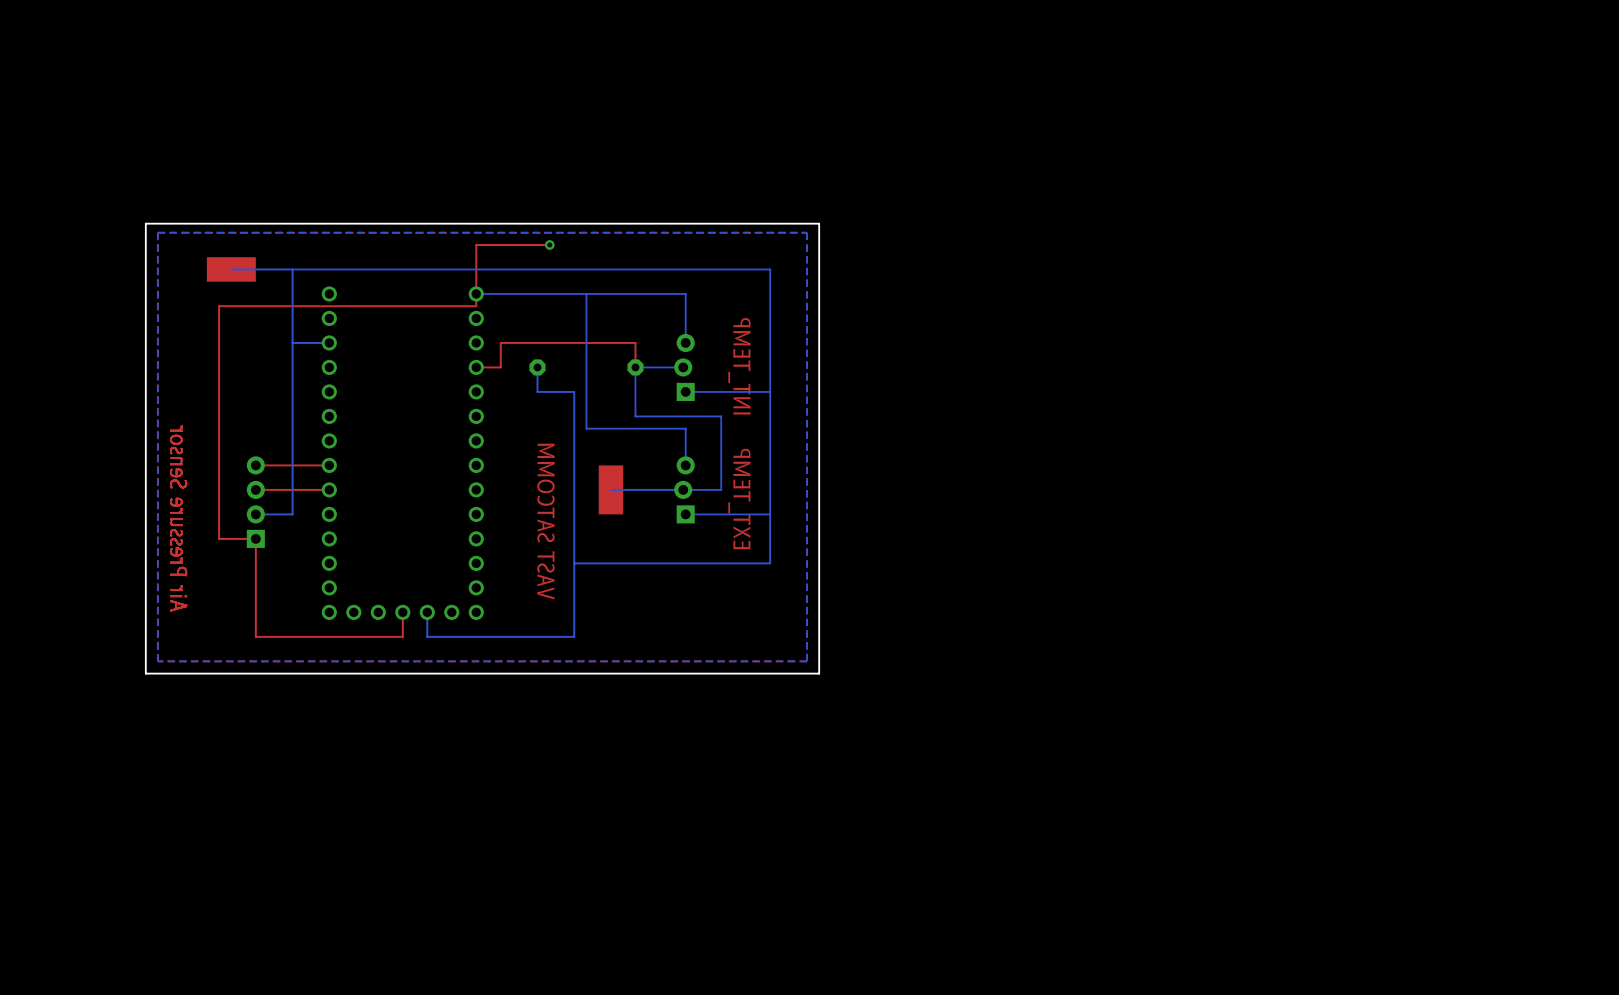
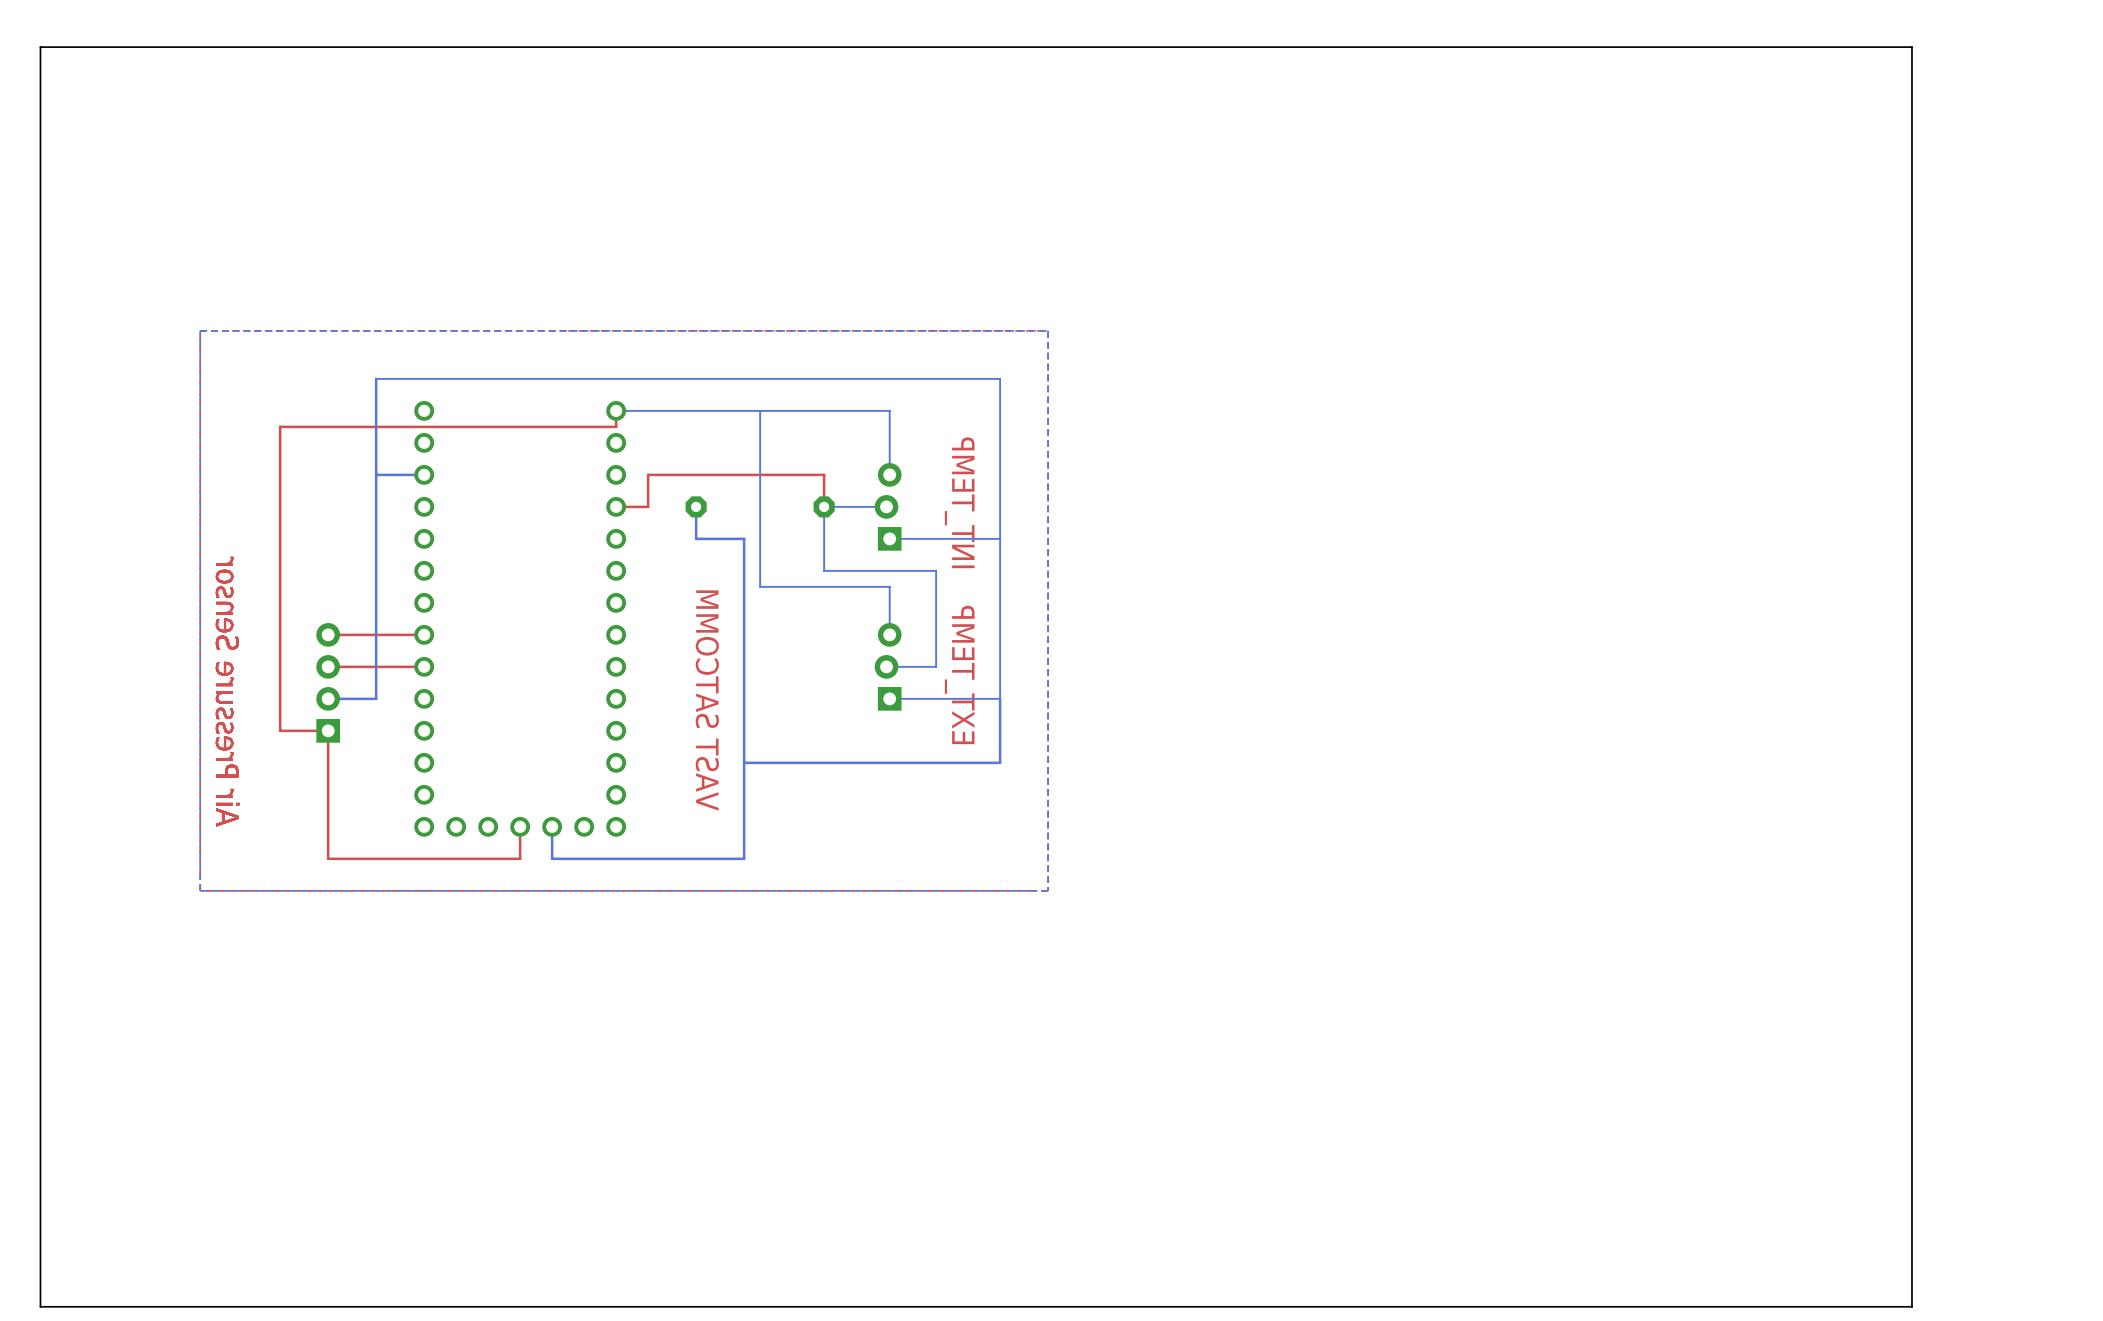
board edge: none -> (1911, 47) (40, 47) (40, 1306) (1911, 1306) (1911, 47)
board edge: (819, 223) (145, 223) (145, 673) (819, 673) (819, 223) -> none
top track: (549, 244) (476, 244) (476, 293) -> none
via: (549, 244) -> none
part: (231, 269) -> none
bottom track: (292, 269) (231, 269) -> none
part: (610, 489) -> none
bottom track: (683, 489) (610, 489) -> none

